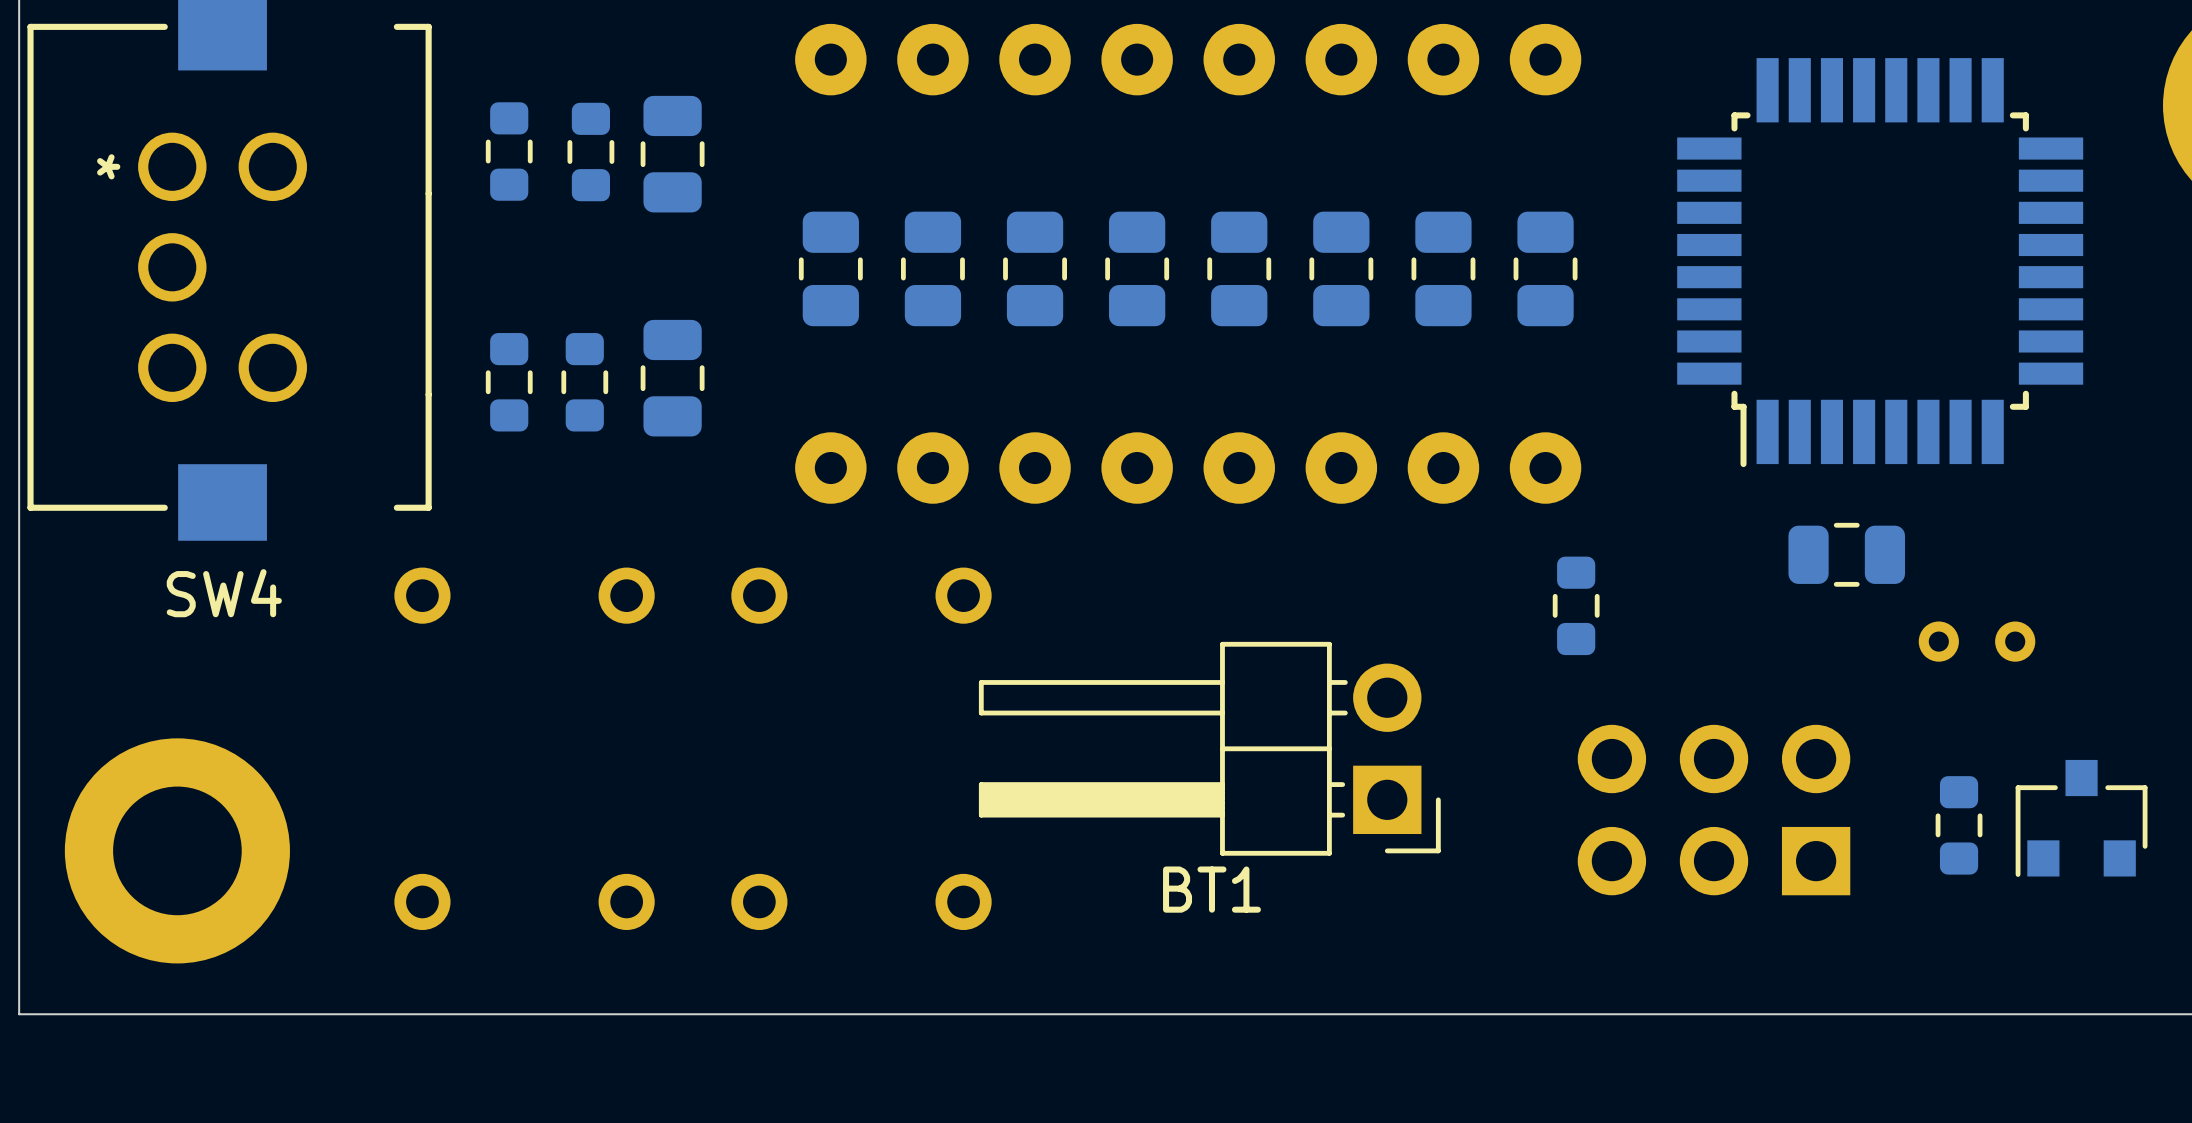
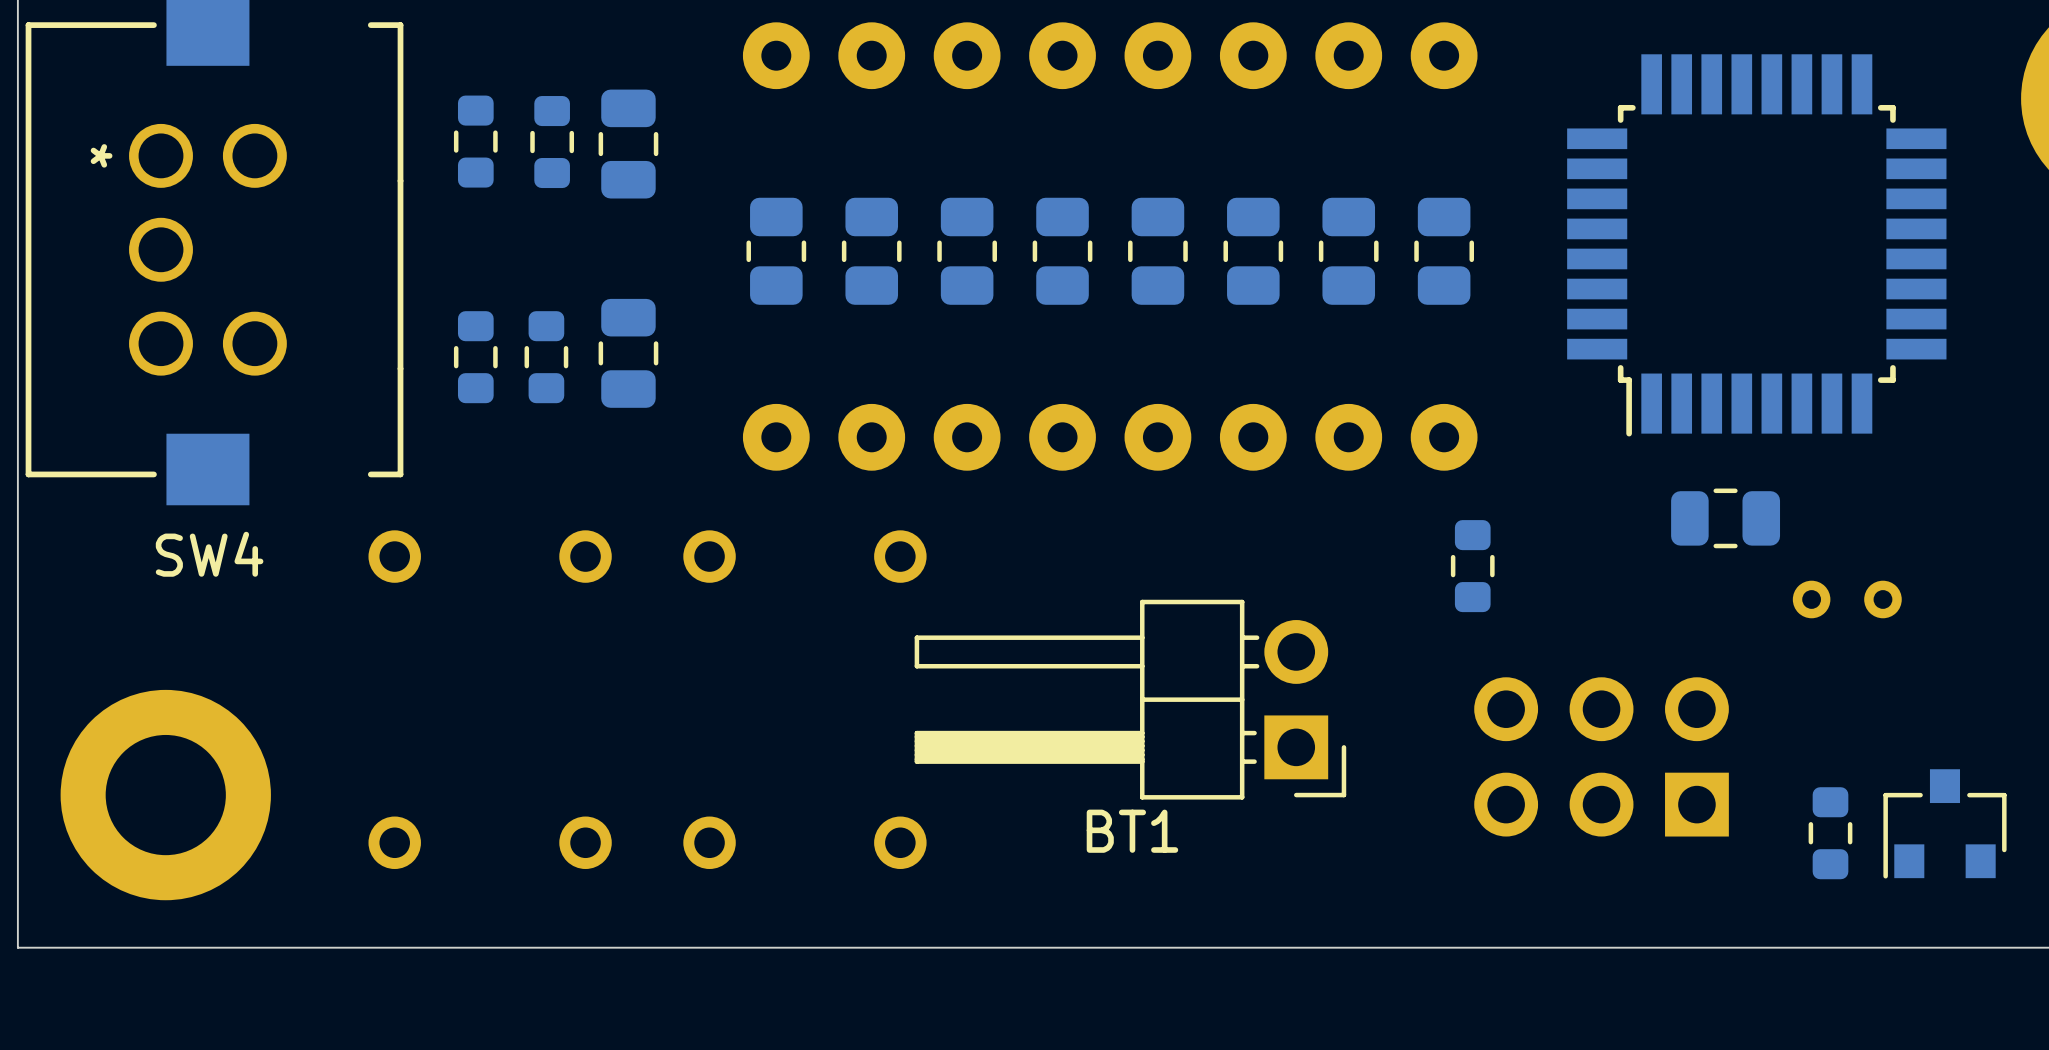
part position: (2081, 818) -> (1944, 823)
part position: (1959, 825) -> (1830, 833)

